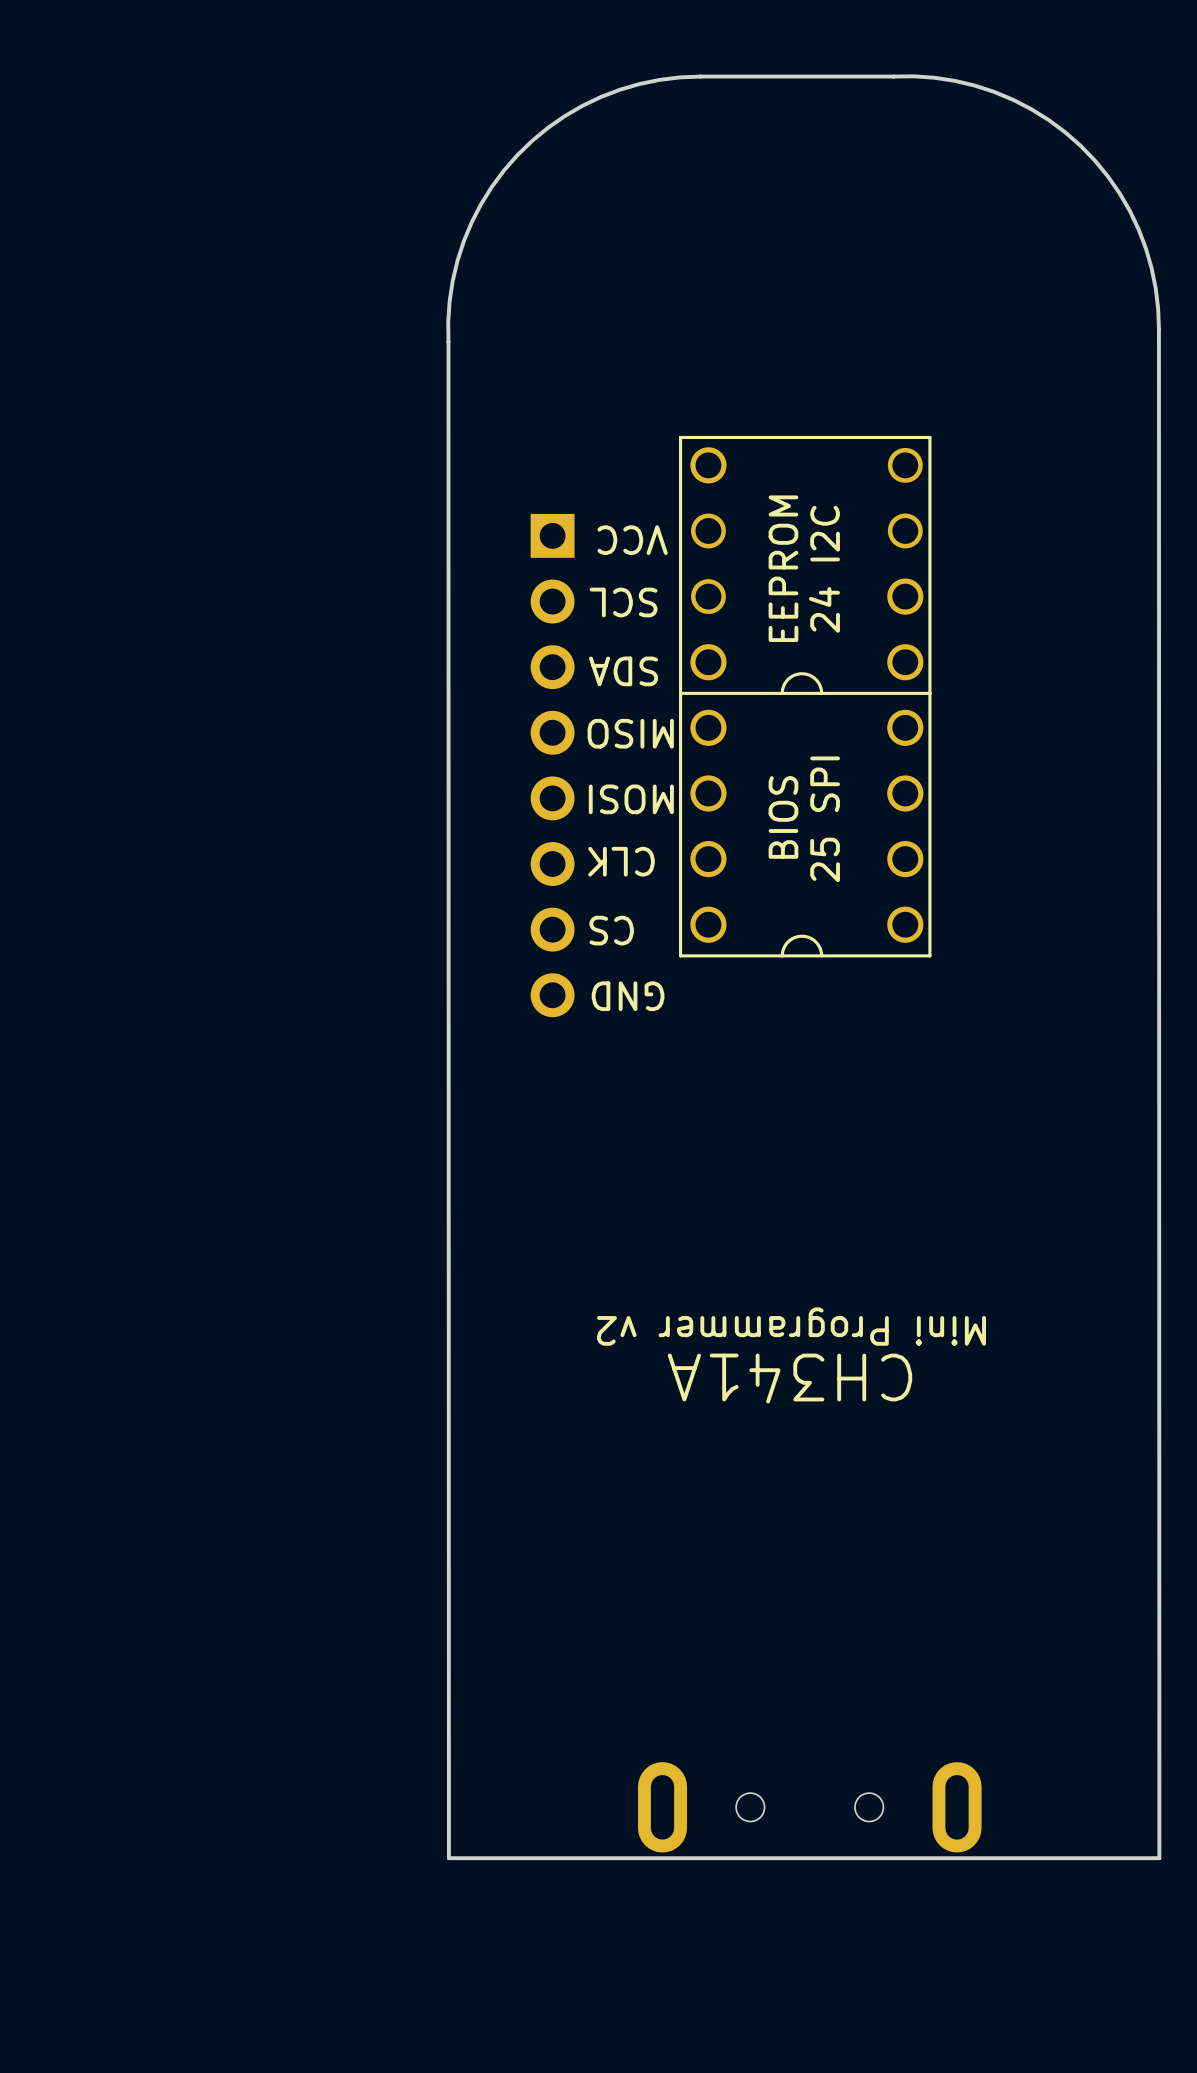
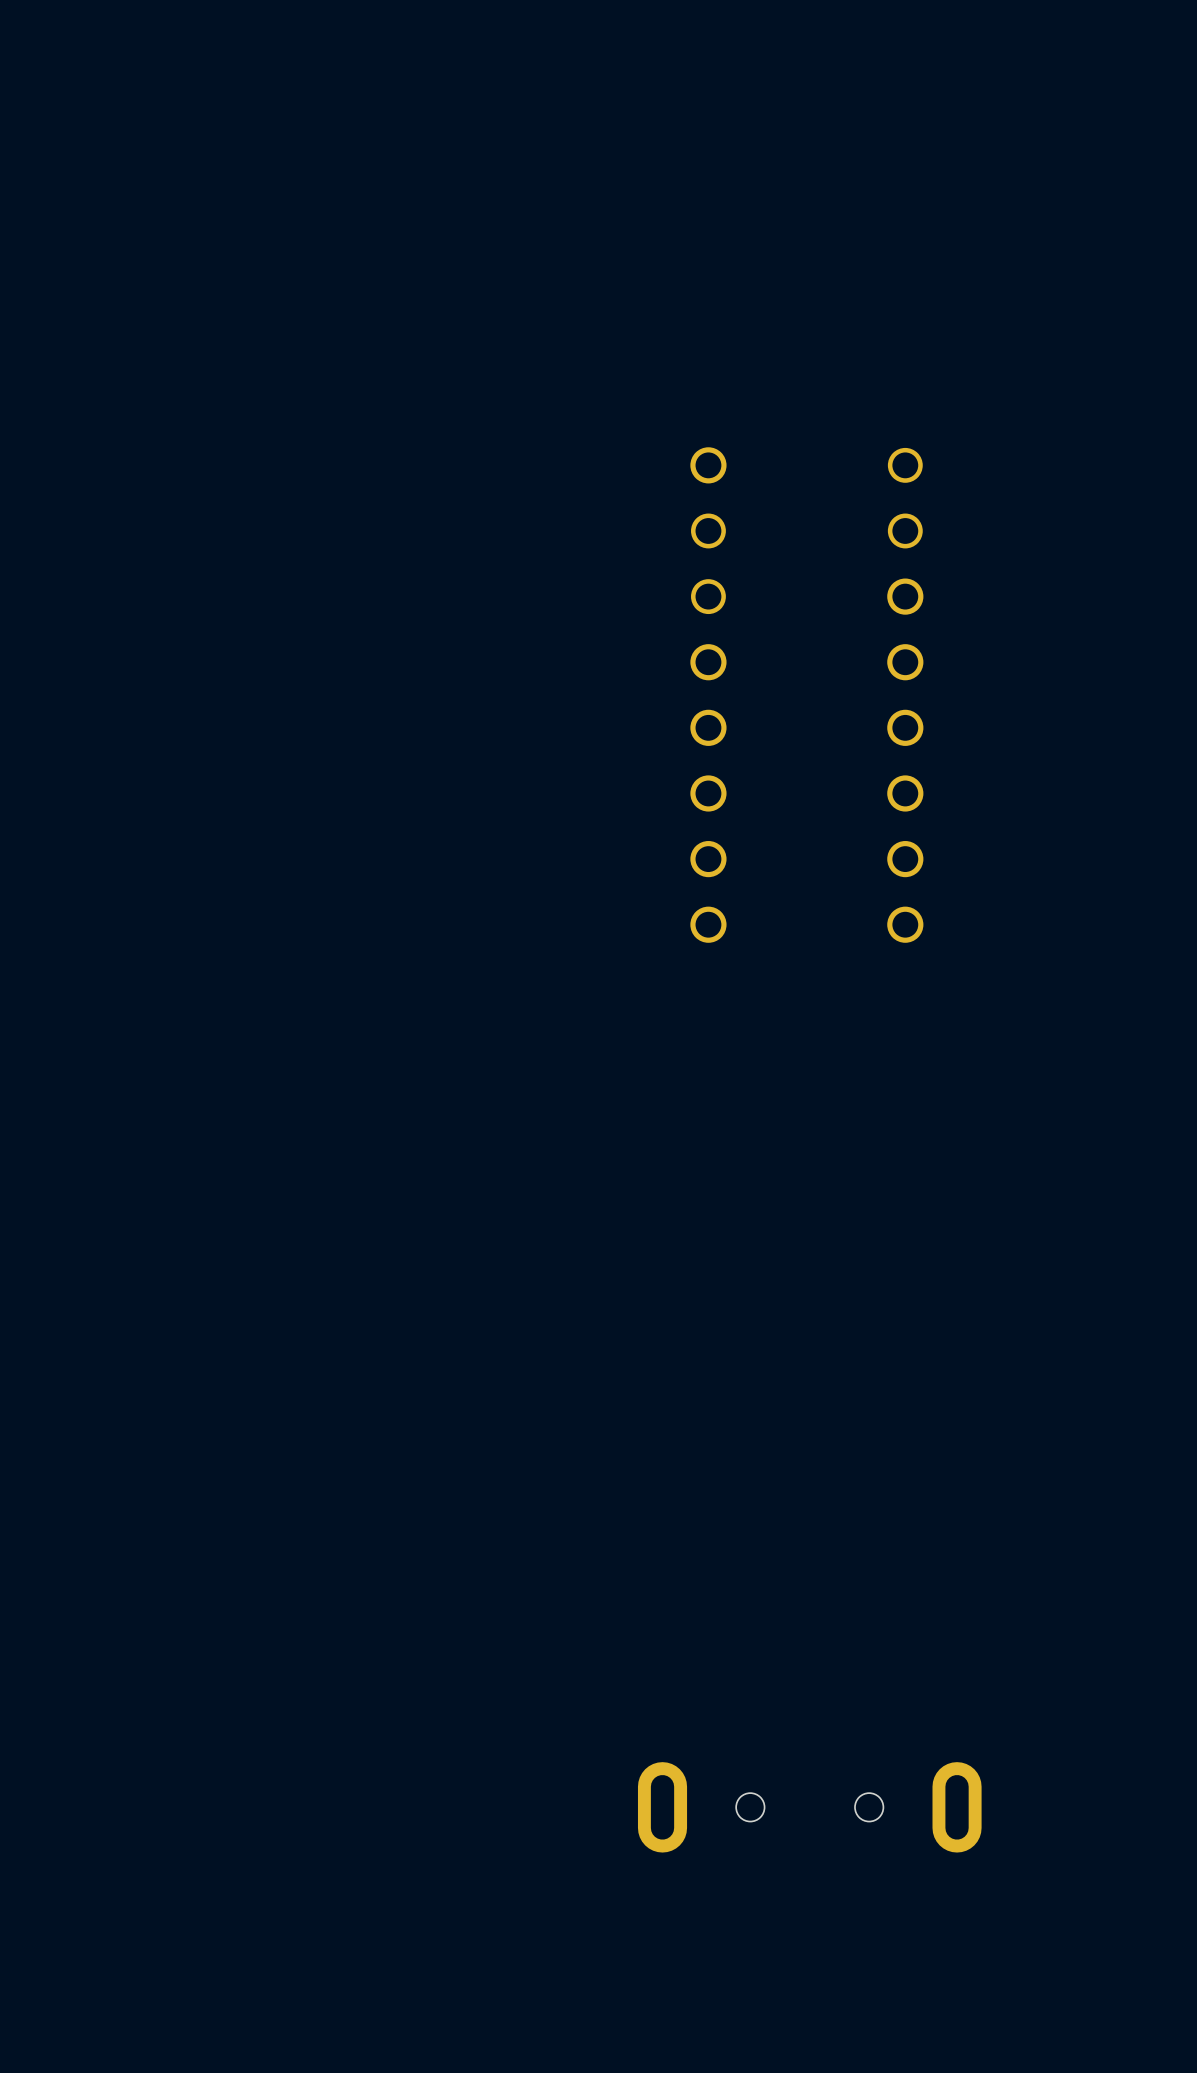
board edge: (893, 76) (680, 77) (639, 83) (600, 97) (564, 116) (532, 140) (517, 155) (504, 170) (481, 204) (471, 222) (457, 260) (452, 280) (448, 321) (448, 1858) (1159, 1858) (1158, 329) (1155, 288) (1145, 248) (1138, 229) (1119, 193) (1094, 160) (1065, 132) (1048, 120) (1013, 99) (974, 85) (934, 77) (893, 76) -> none
line: (929, 437) (929, 955) (680, 955) (680, 437) (929, 437) -> none
text: VCC (632, 540) -> none
text: EEPROM (783, 568) -> none
text: 24 I2C (824, 569) -> none
text: SCL (623, 602) -> none
text: SDA (623, 671) -> none
line: (821, 693) (815, 679) (801, 673) (788, 679) (782, 693) -> none
line: (929, 693) (680, 693) -> none
text: MISO (630, 733) -> none
part: (552, 765) -> none
text: MOSI (631, 799) -> none
text: BIOS (783, 817) -> none
text: 25 SPI (825, 819) -> none
text: CLK (621, 861) -> none
text: CS (611, 930) -> none
line: (821, 955) (815, 941) (801, 936) (788, 941) (782, 955) -> none
text: GND (628, 996) -> none
text: Mini Programmer v2 (791, 1326) -> none
text: CH341A (790, 1378) -> none

